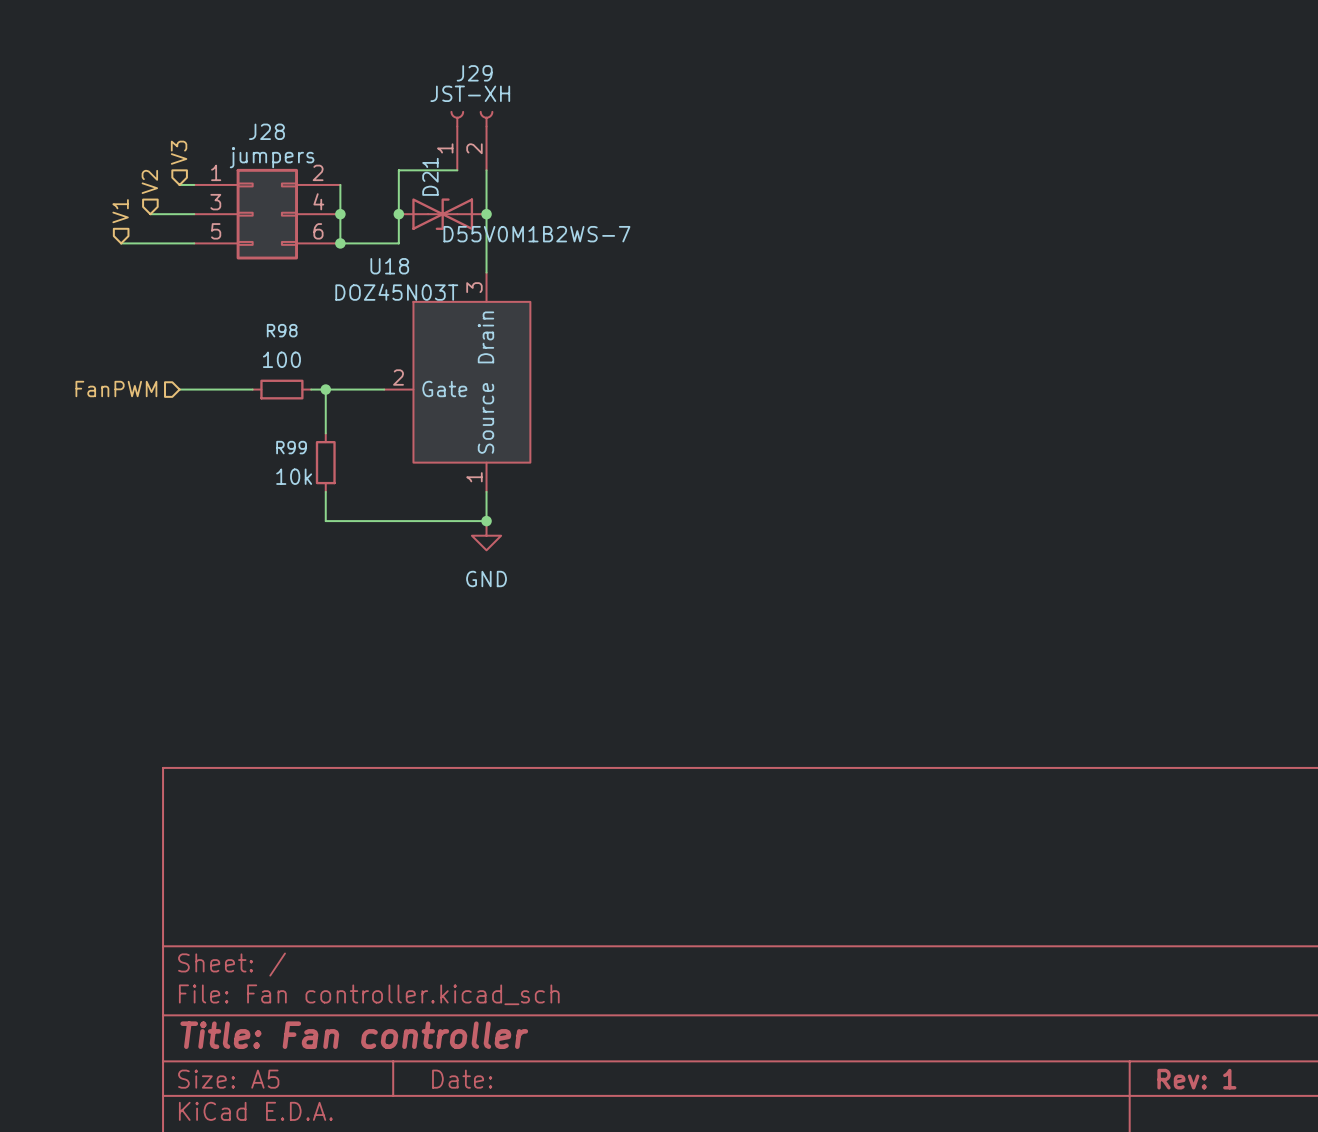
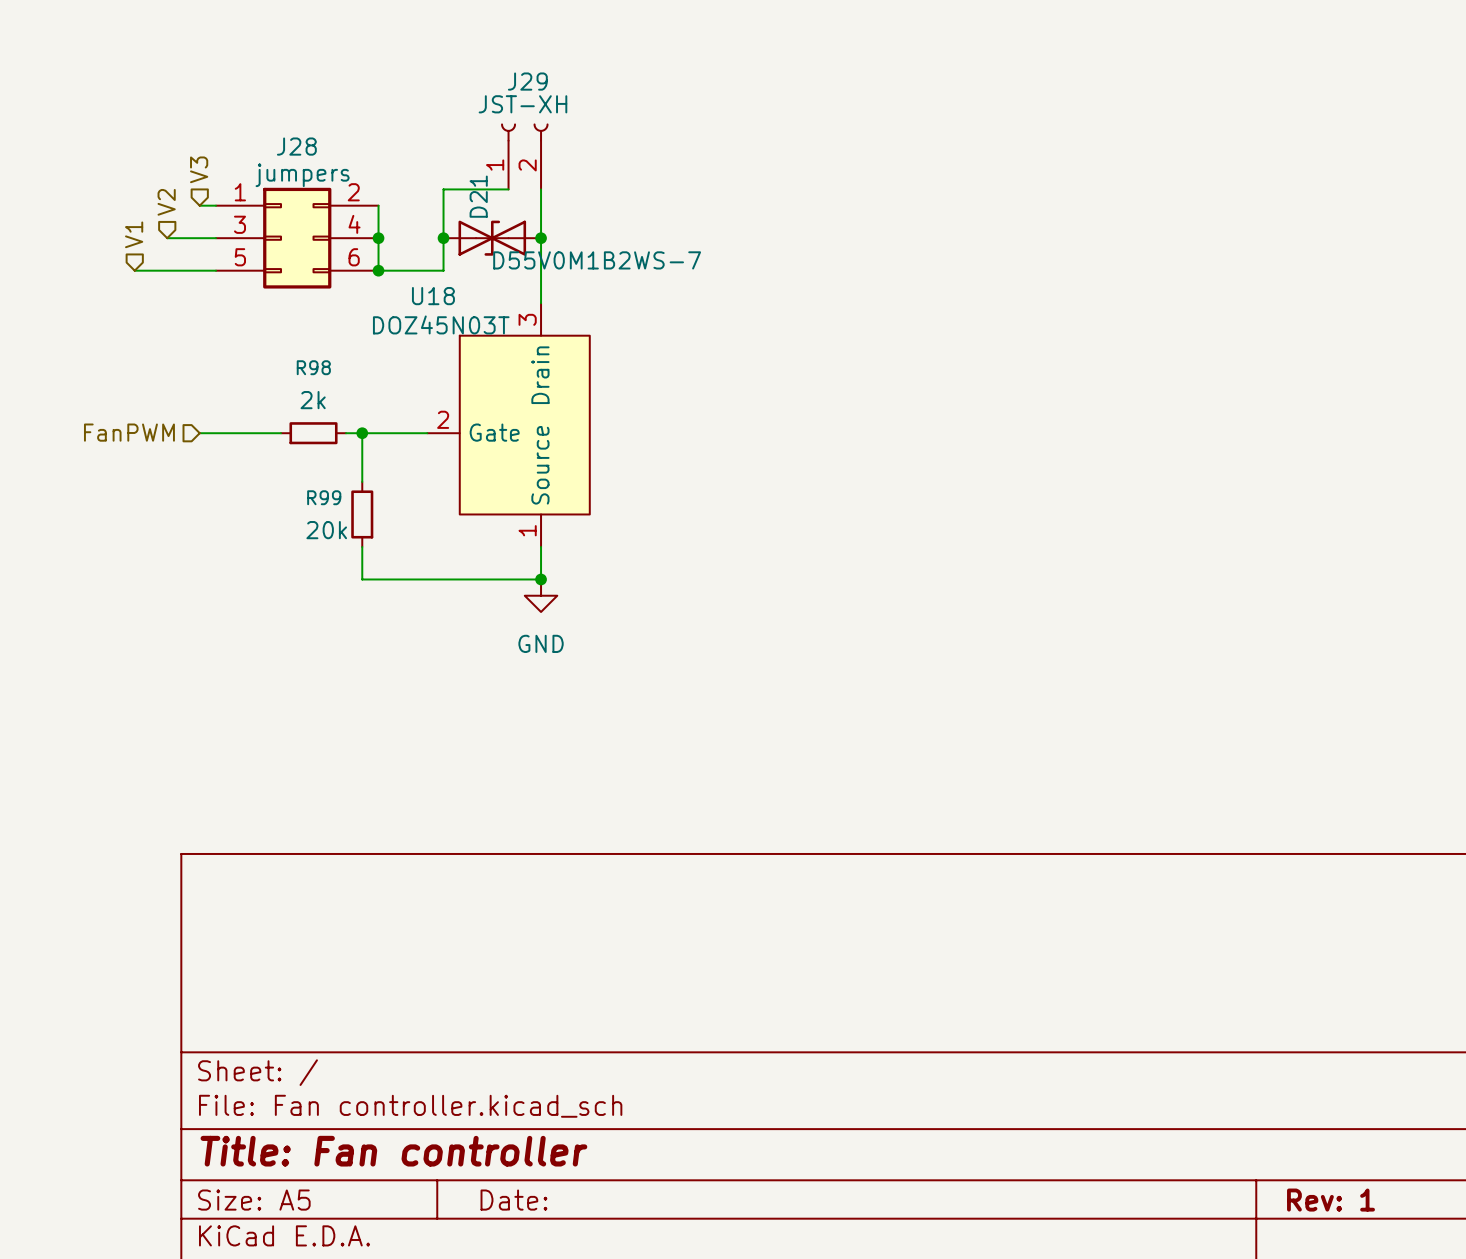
R98 value: 100 (281, 359) -> 2k (313, 400)
R99 value: 10k (294, 476) -> 20k (326, 530)

